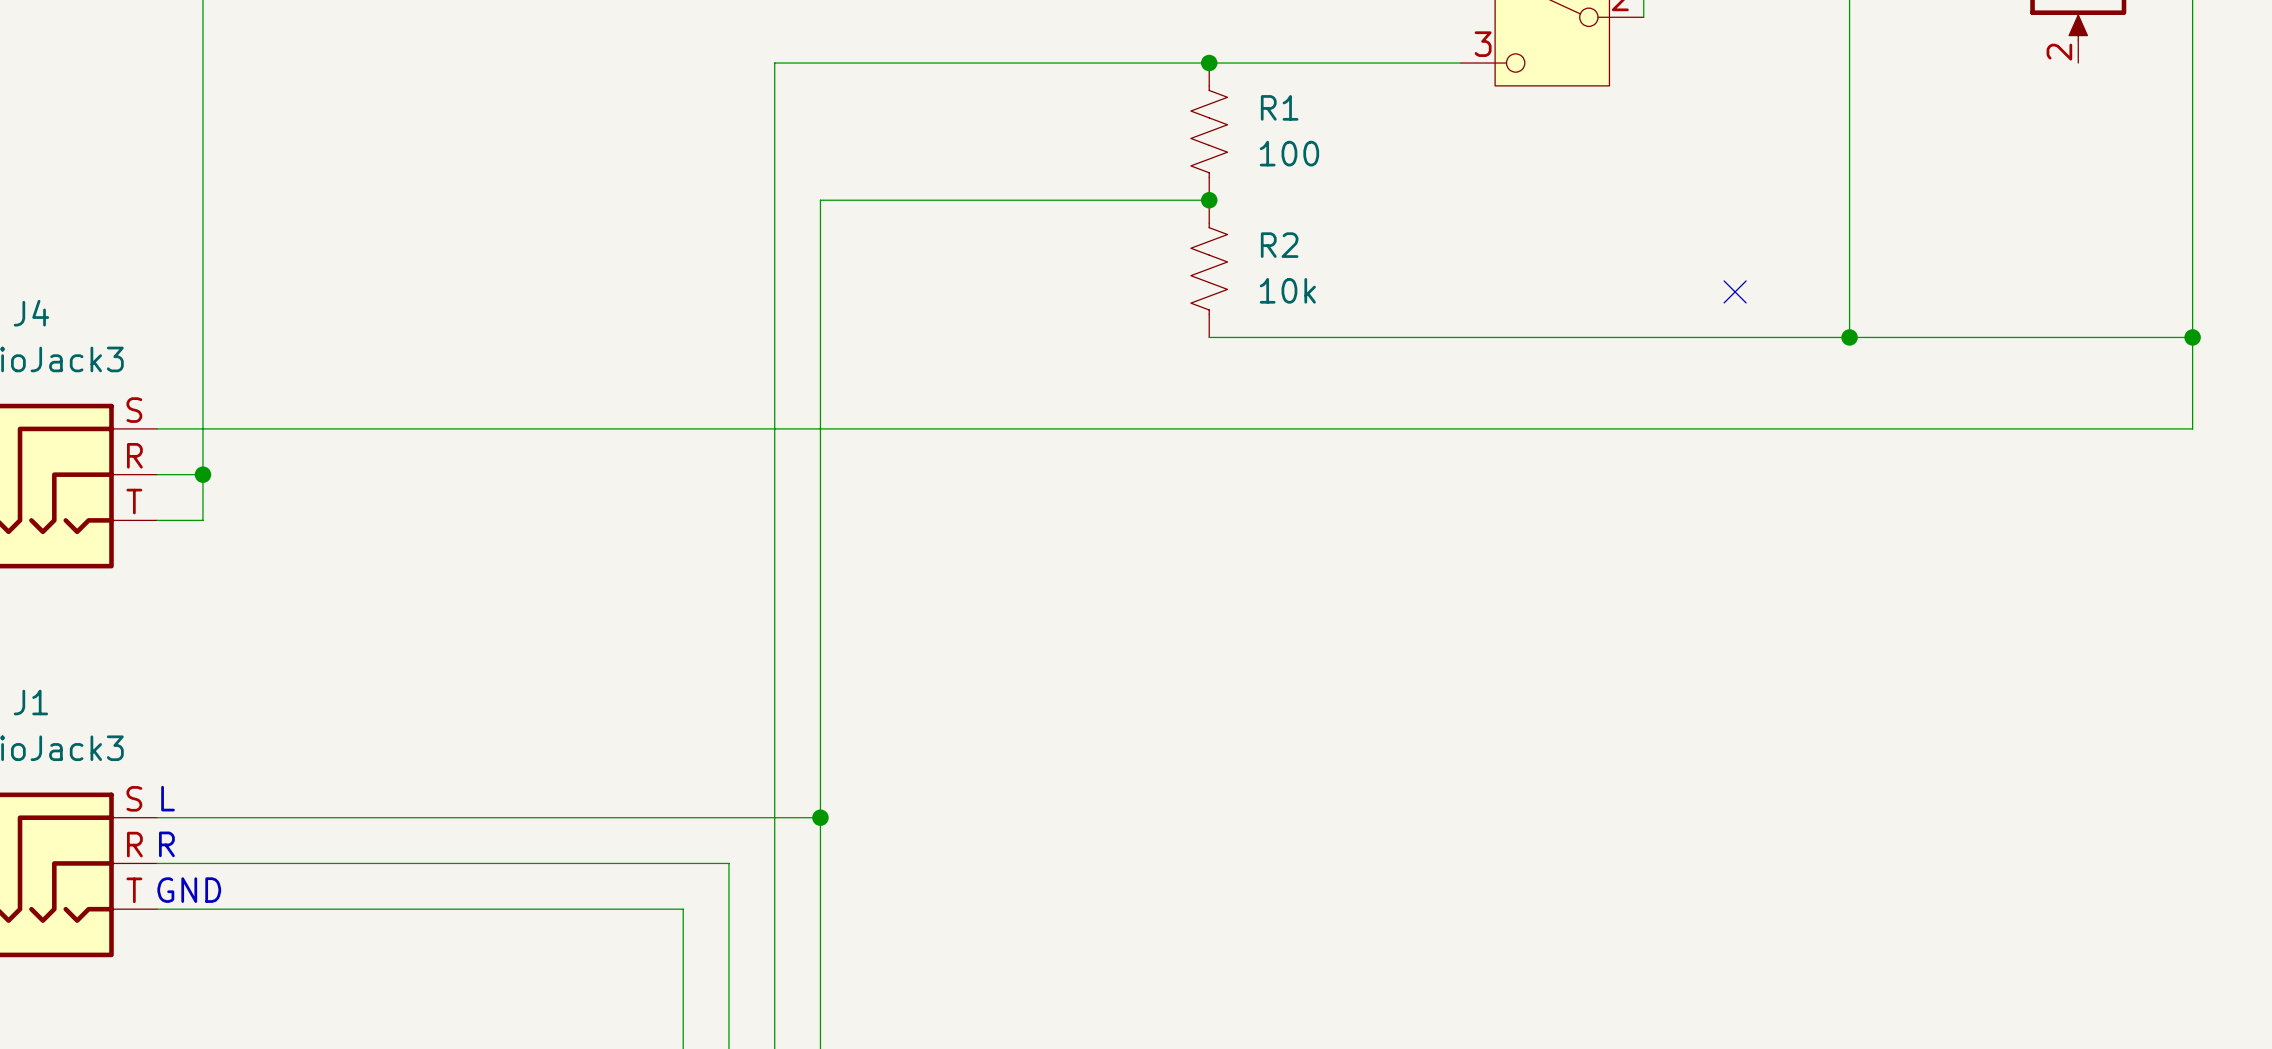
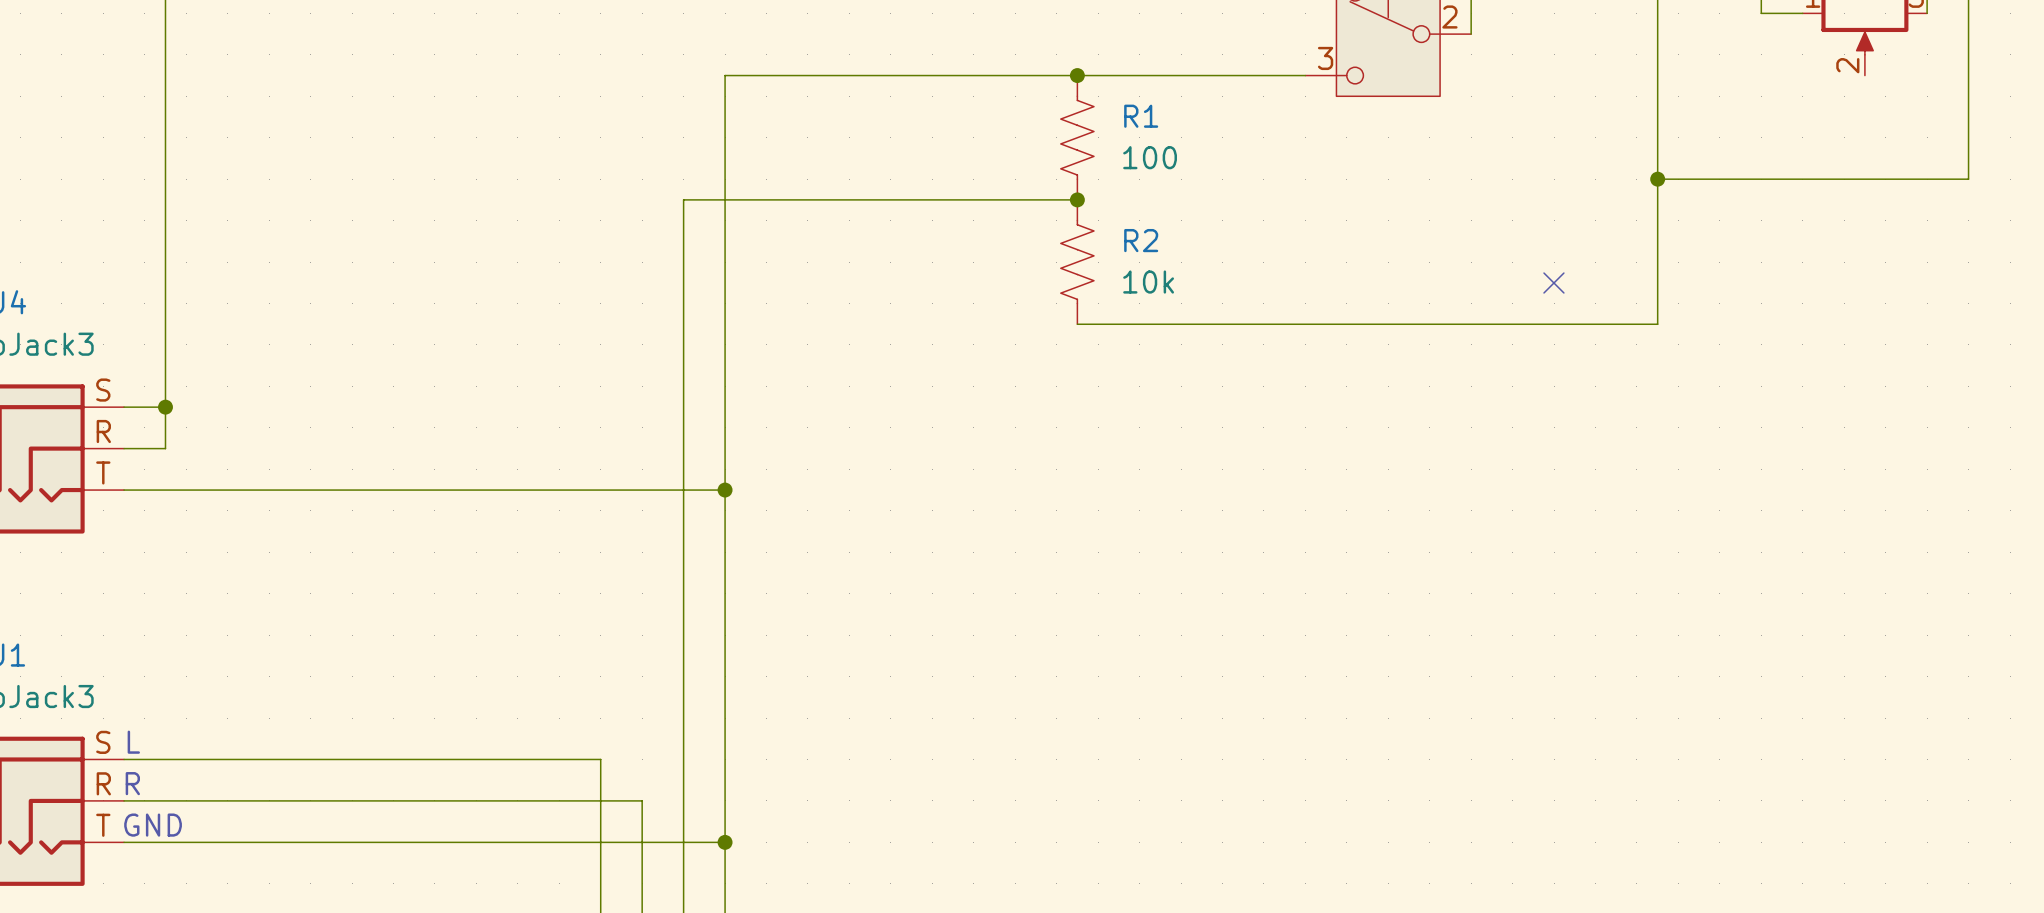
wire: (820, 63) (774, 63) (774, 200) -> (725, 75) (725, 199) (683, 199)
junction: none -> (1657, 179)
wire: (2192, 177) (2192, 428) (202, 428) -> (1968, 179) (1657, 179)
wire: (1849, 337) (2192, 337) -> none
junction: (1849, 337) -> none
junction: (2192, 337) -> none
wire: (202, 474) (202, 520) -> (725, 490) (165, 490)
junction position: (202, 474) -> (165, 407)
junction: none -> (725, 490)
wire: (683, 817) (820, 817) -> (600, 759) (600, 842) (725, 842)
junction position: (820, 817) -> (725, 842)

